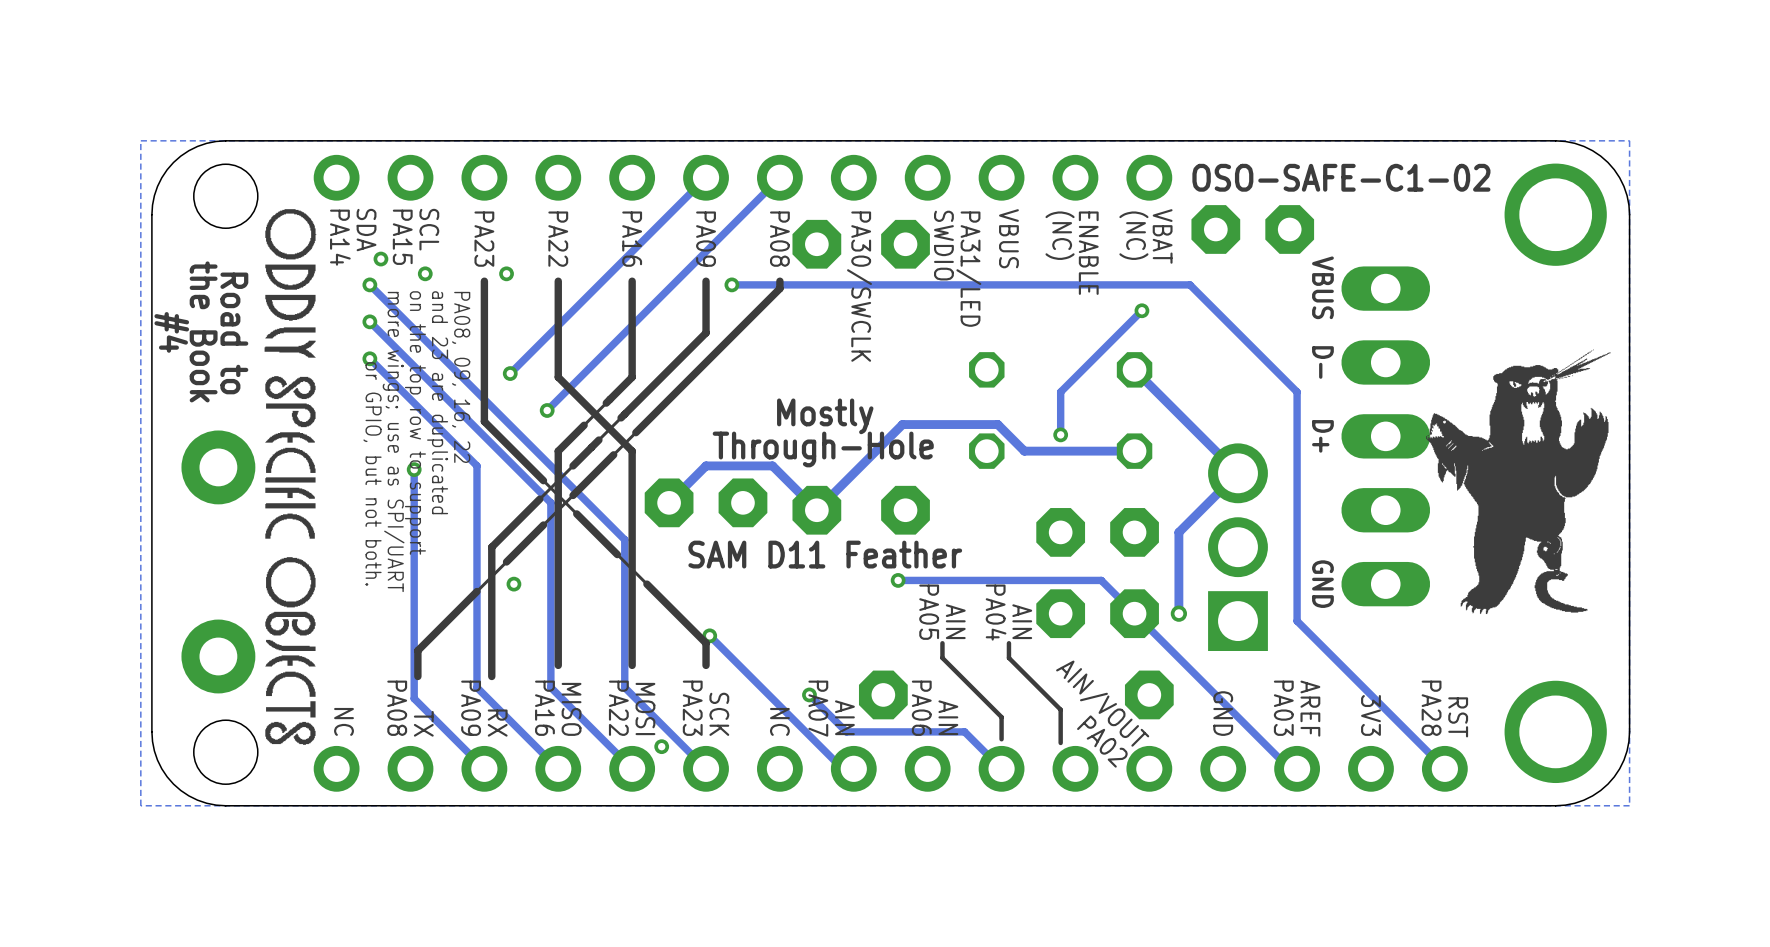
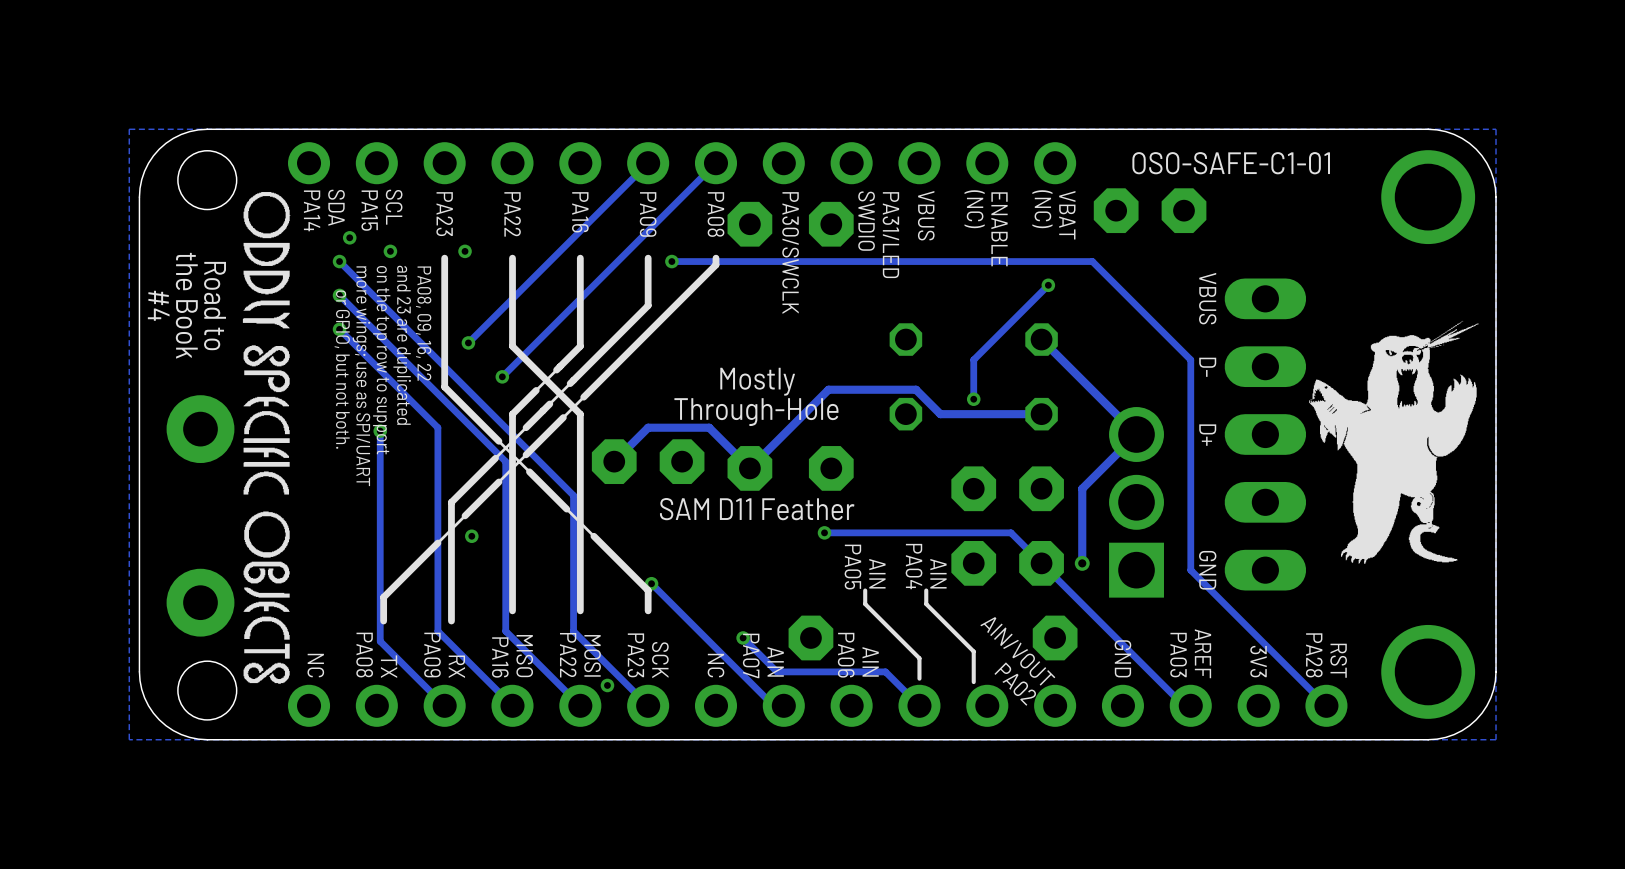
text: OSO-SAFE-C1-02 (1341, 177) -> OSO-SAFE-C1-01 (1231, 163)
text position: VBUS (1322, 287) -> VBUS (1207, 298)
text position: D- (1322, 362) -> D- (1207, 367)
text position: D+ (1322, 436) -> D+ (1207, 435)
part position: (1385, 436) -> (1265, 434)
text position: GND (1322, 584) -> GND (1207, 570)

